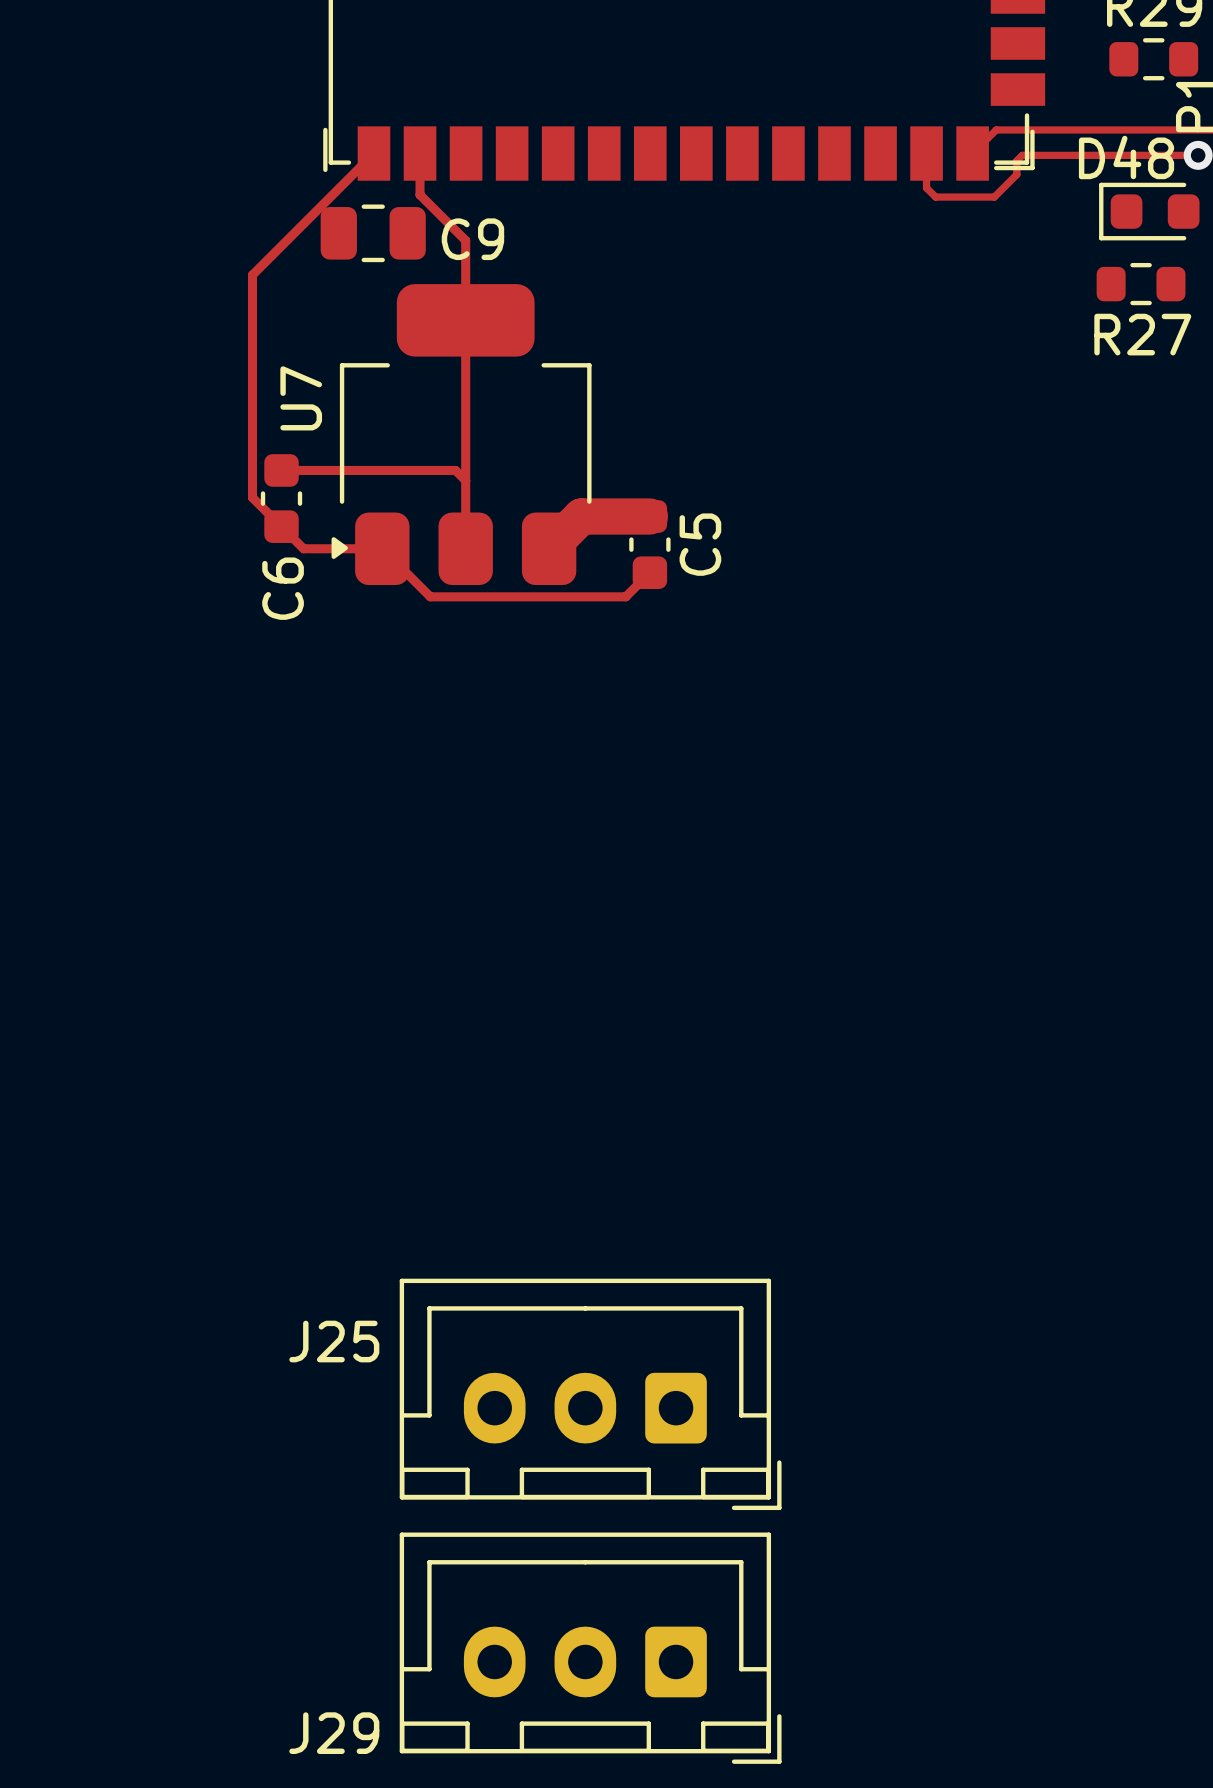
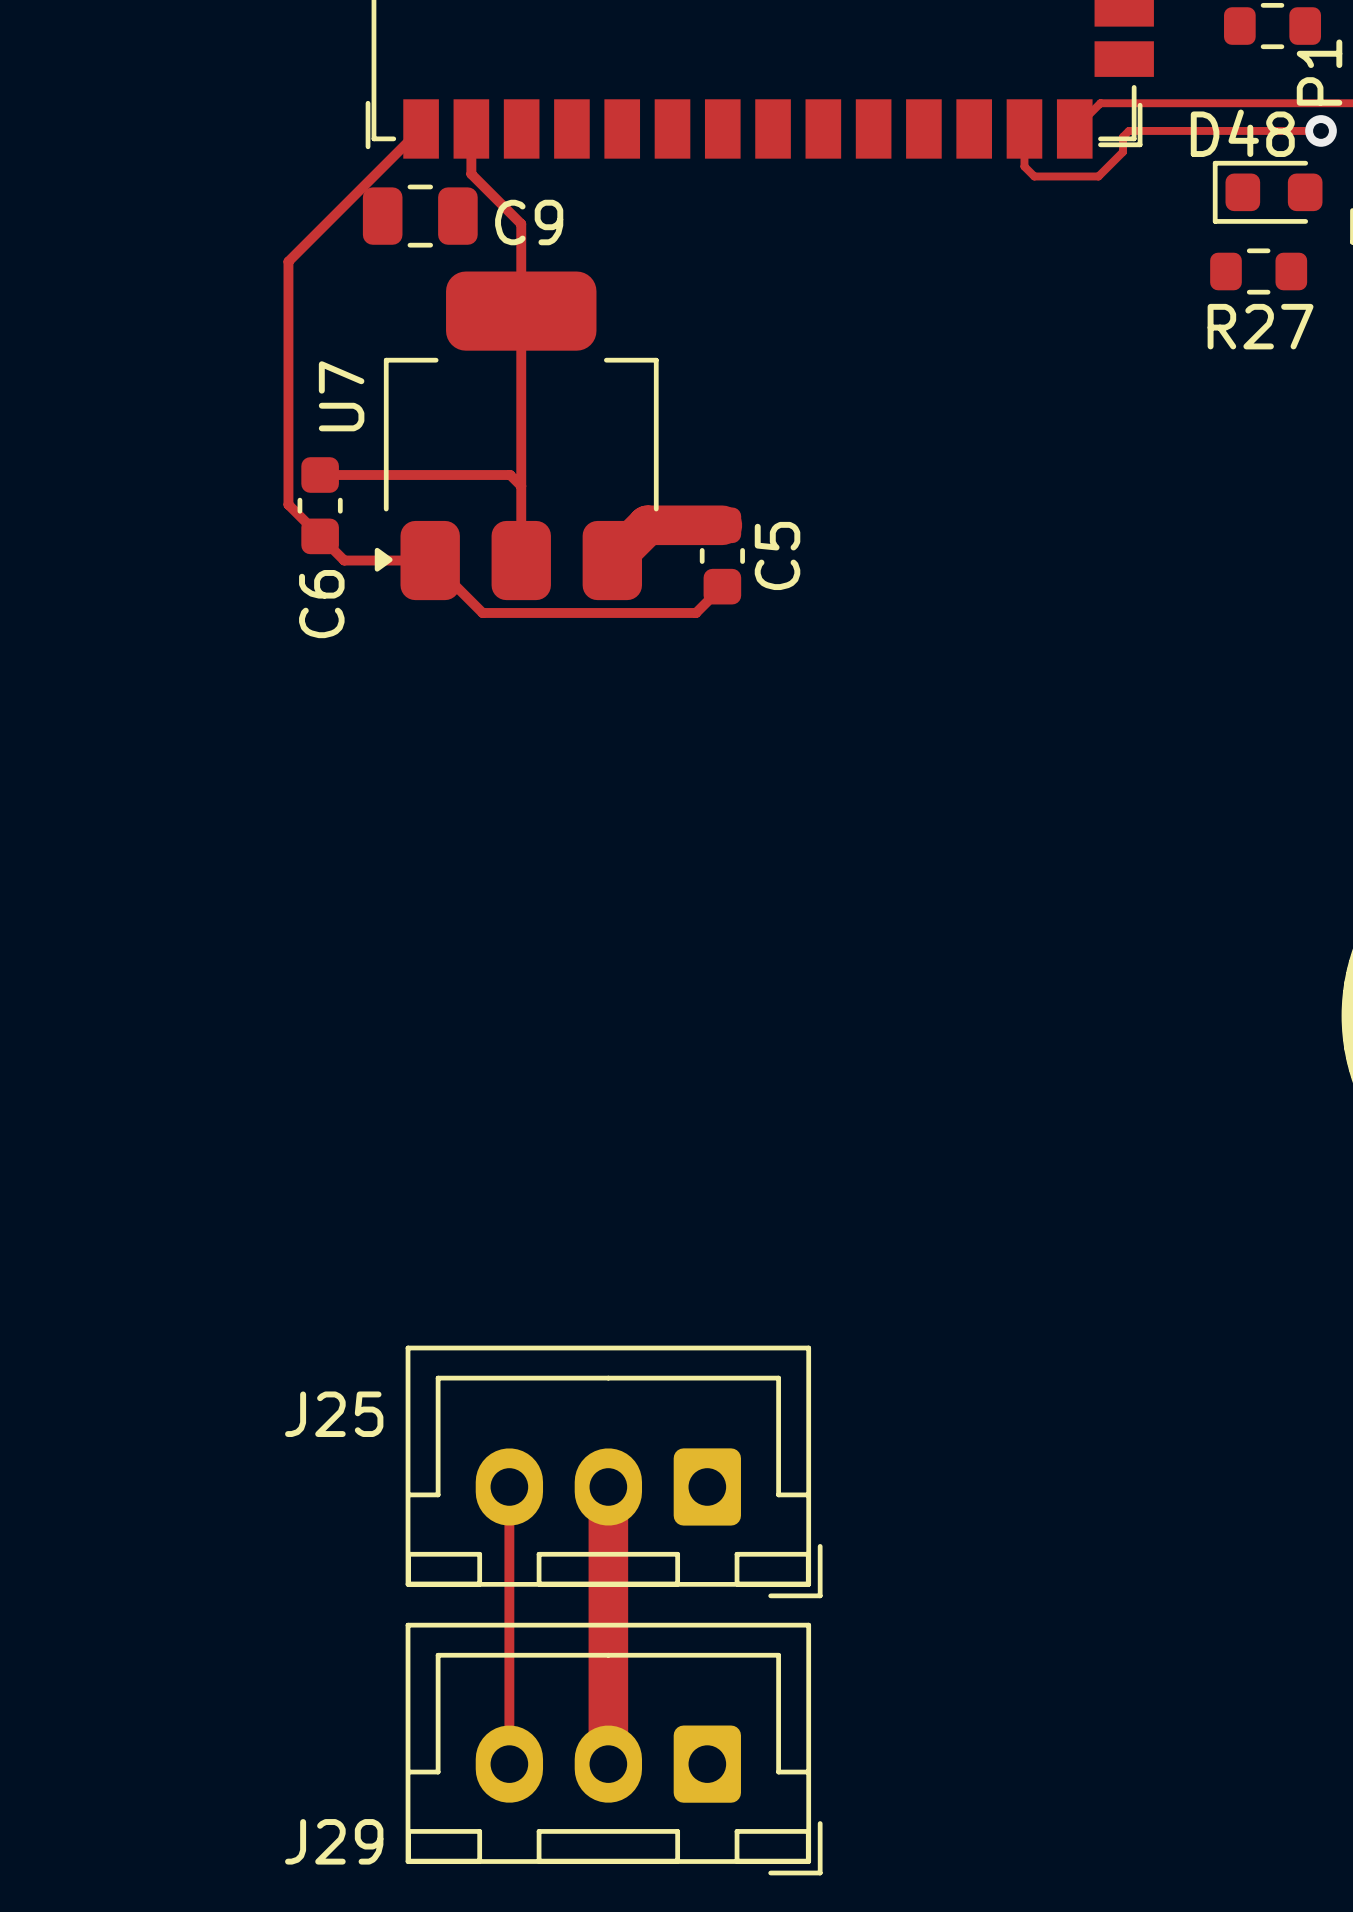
J25 position: (590, 1394) -> (614, 1471)
track: none -> (509, 1486) (509, 1764)
track: none -> (608, 1486) (608, 1764)
J29 position: (590, 1648) -> (614, 1749)

